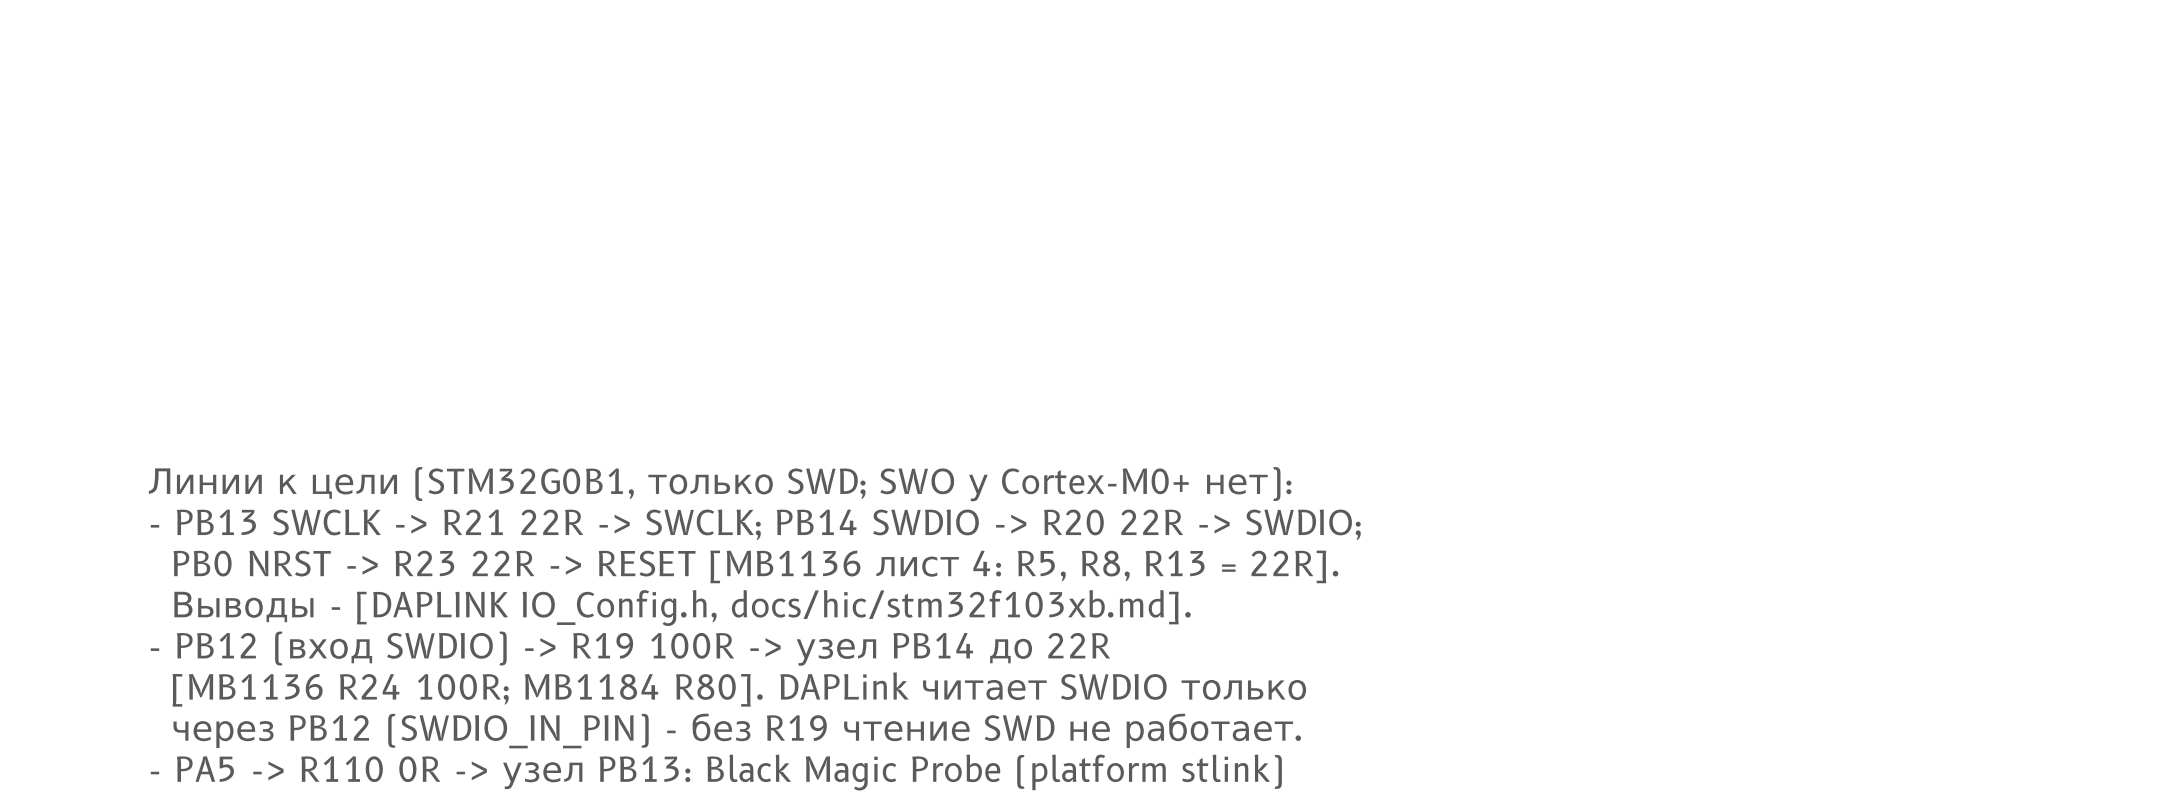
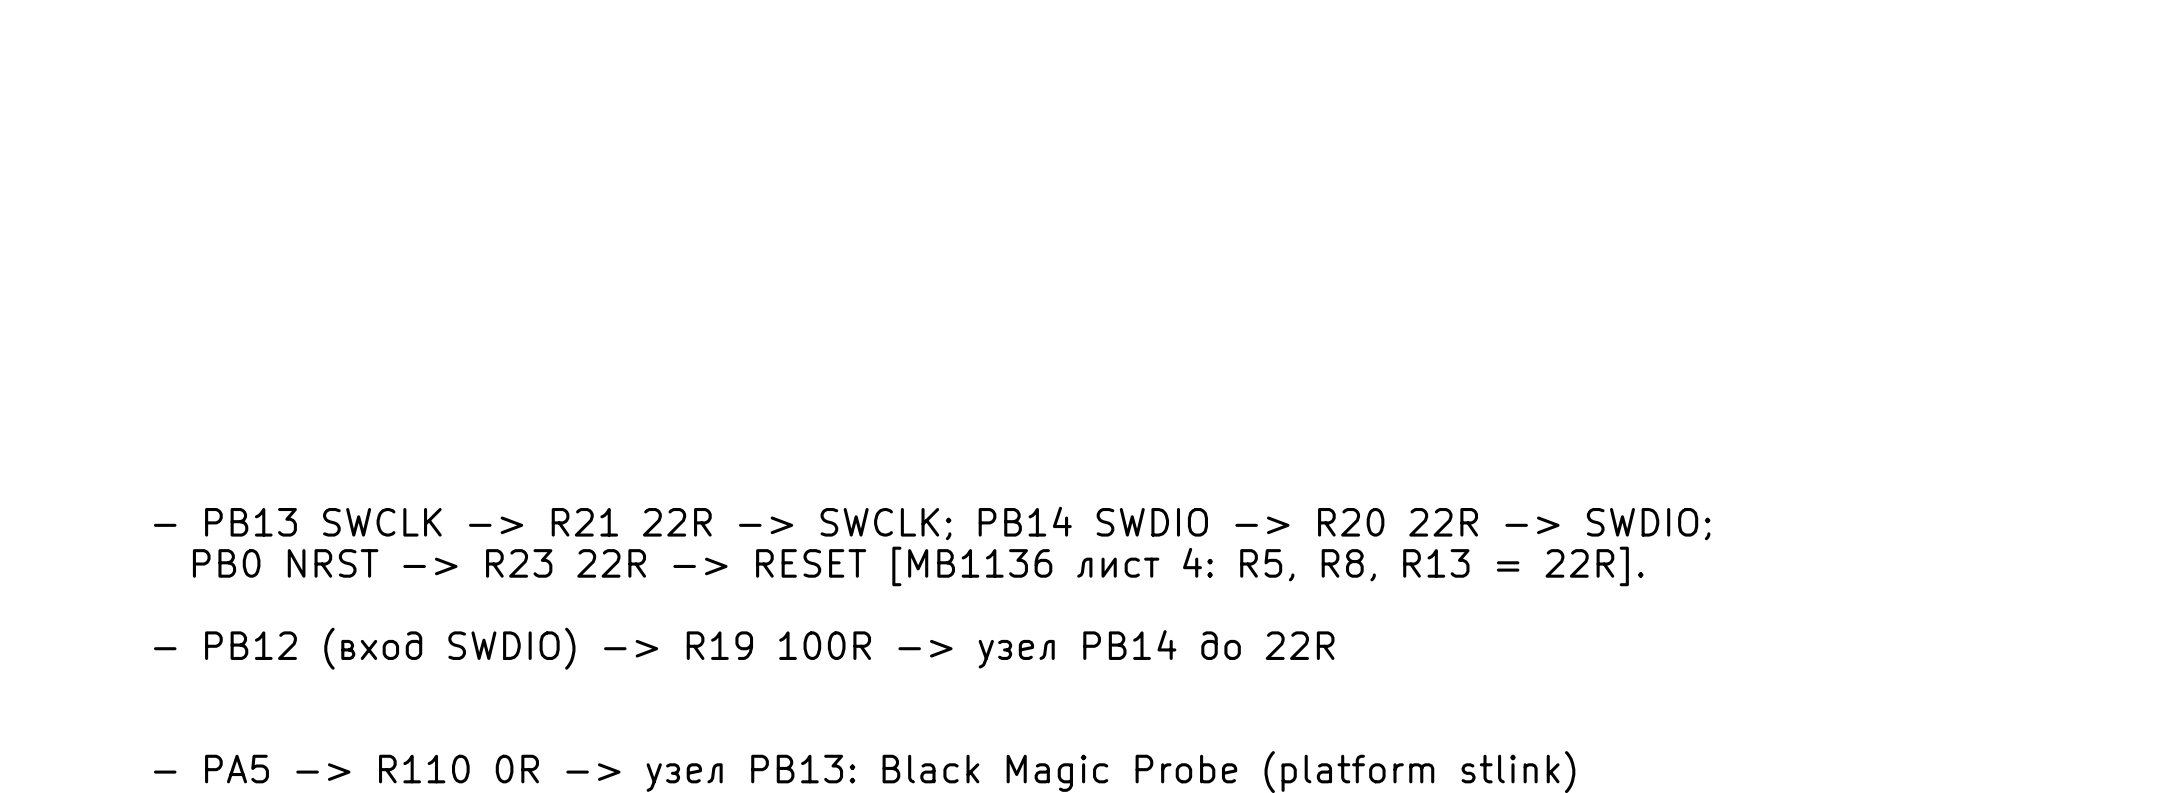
text: Линии к цели (STM32G0B1, только SWD; SWO у Cortex-M0+ нет): (720, 484) -> none
text: Выводы - [DAPLINK IO_Config.h, docs/hic/stm32f103xb.md]. (682, 608) -> none
text: [MB1136 R24 100R; MB1184 R80]. DAPLink читает SWDIO только (739, 689) -> none
text: через PB12 (SWDIO_IN_PIN) - без R19 чтение SWD не работает. (737, 730) -> none

